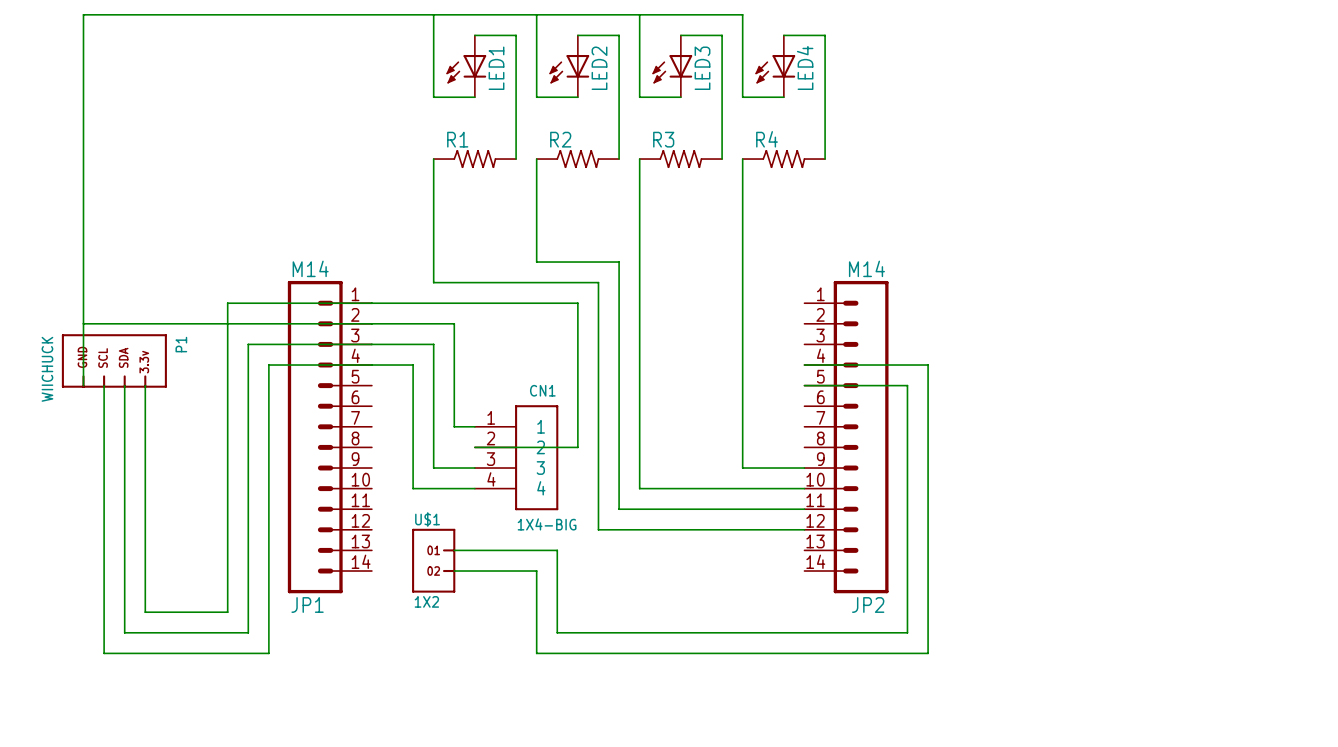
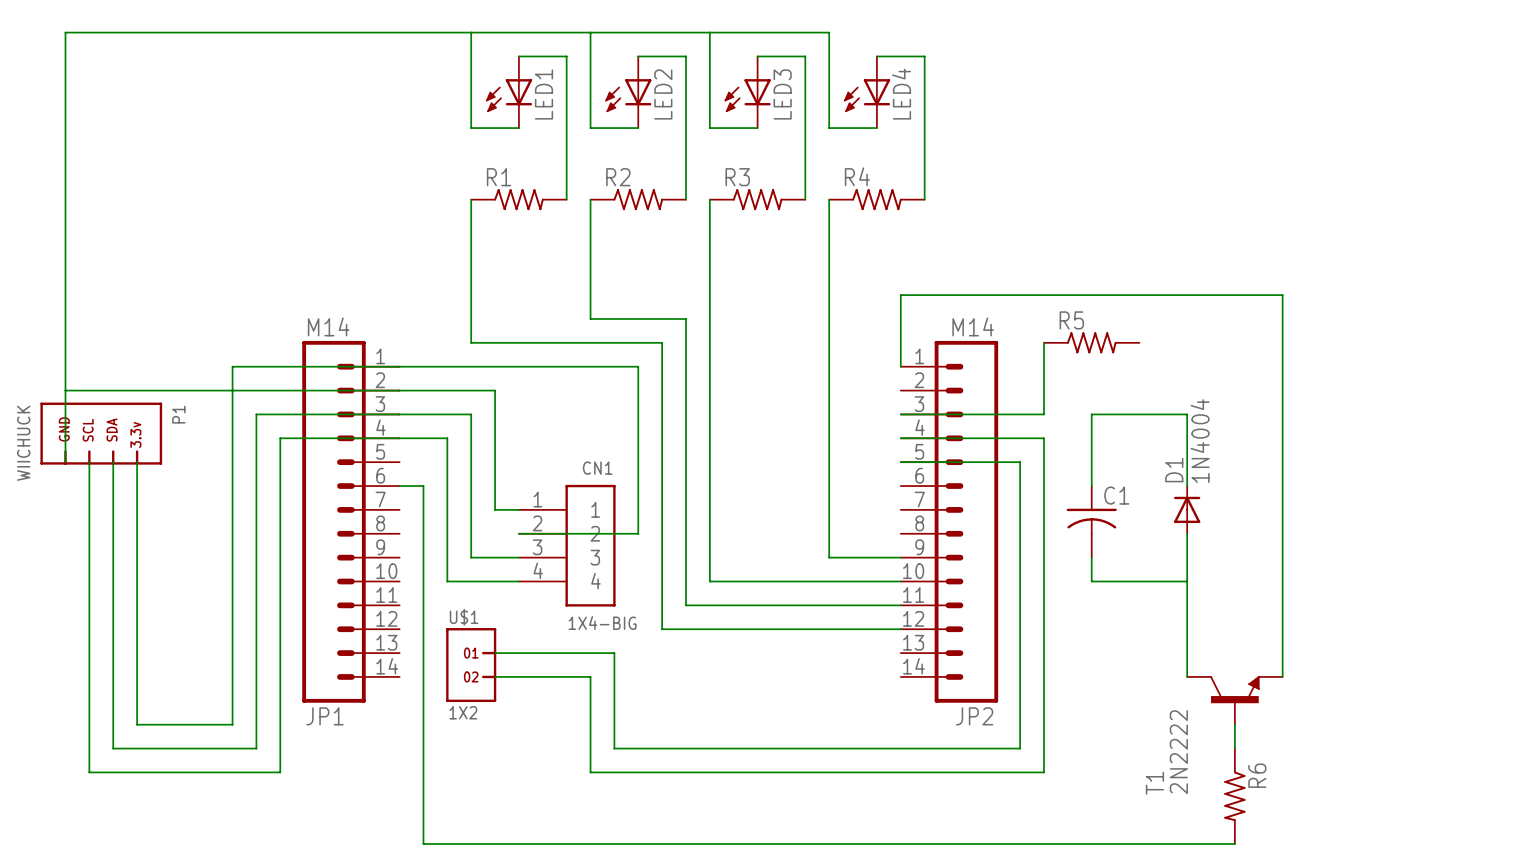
wire: none -> (1043, 342) (1043, 414) (900, 414)
R5: none -> (1091, 342)
wire: none -> (900, 366) (900, 295) (1282, 295) (1282, 676)
wire: none -> (399, 486) (423, 486) (423, 844) (1234, 844)
wire: none -> (1091, 486) (1091, 414) (1187, 414) (1187, 486)
D1: none -> 1N4004 (1187, 509)
C1: none -> (1091, 521)
wire: none -> (1187, 533) (1187, 676)
wire: none -> (1091, 557) (1091, 581) (1187, 581)
T1: none -> 2N2222 (1234, 700)
wire: none -> (1234, 724) (1234, 748)
R6: none -> (1234, 796)

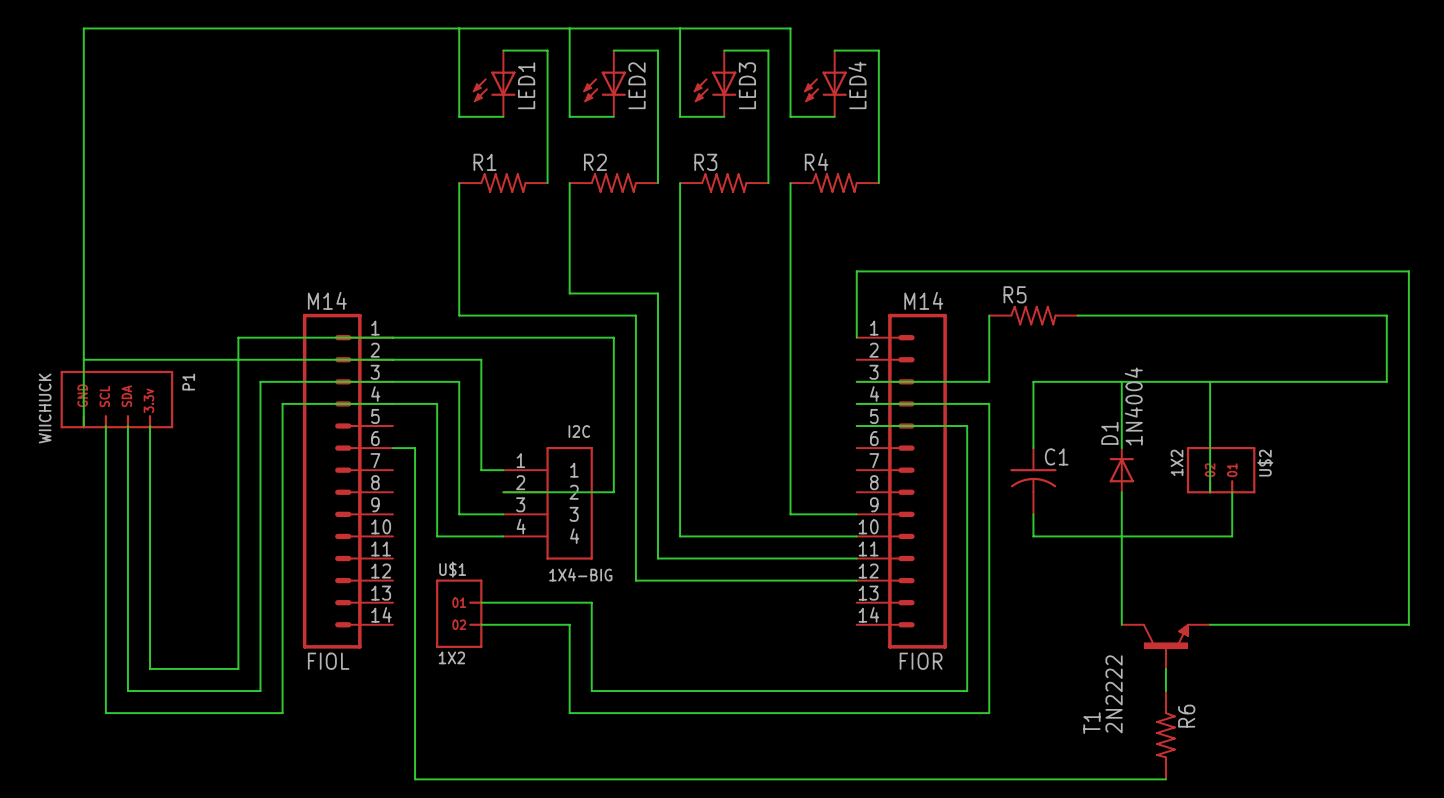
wire: (1282, 295) (1282, 414) -> none
wire: none -> (1077, 315) (1386, 315) (1386, 381) (1121, 381)
CN1 name: CN1 (597, 468) -> I2C (579, 431)
U$2: none -> 1X2 (1221, 470)
wire: (1282, 533) (1282, 676) -> (1210, 271) (1408, 271) (1408, 624) (1210, 624)
wire: none -> (1232, 492) (1232, 536) (1121, 536)
JP1 name: JP1 (325, 716) -> FIOL (328, 661)
JP2 name: JP2 (974, 716) -> FIOR (921, 661)

